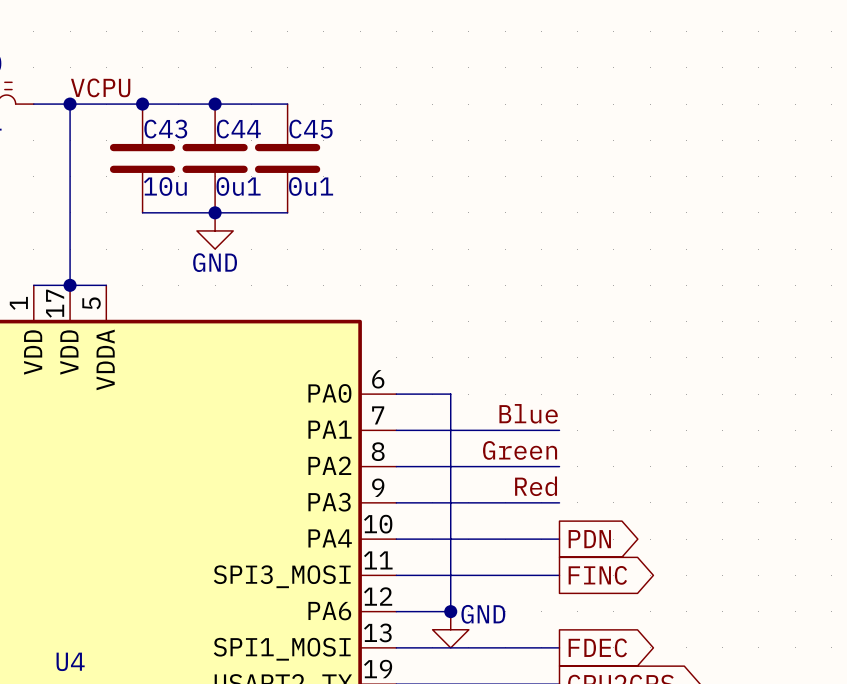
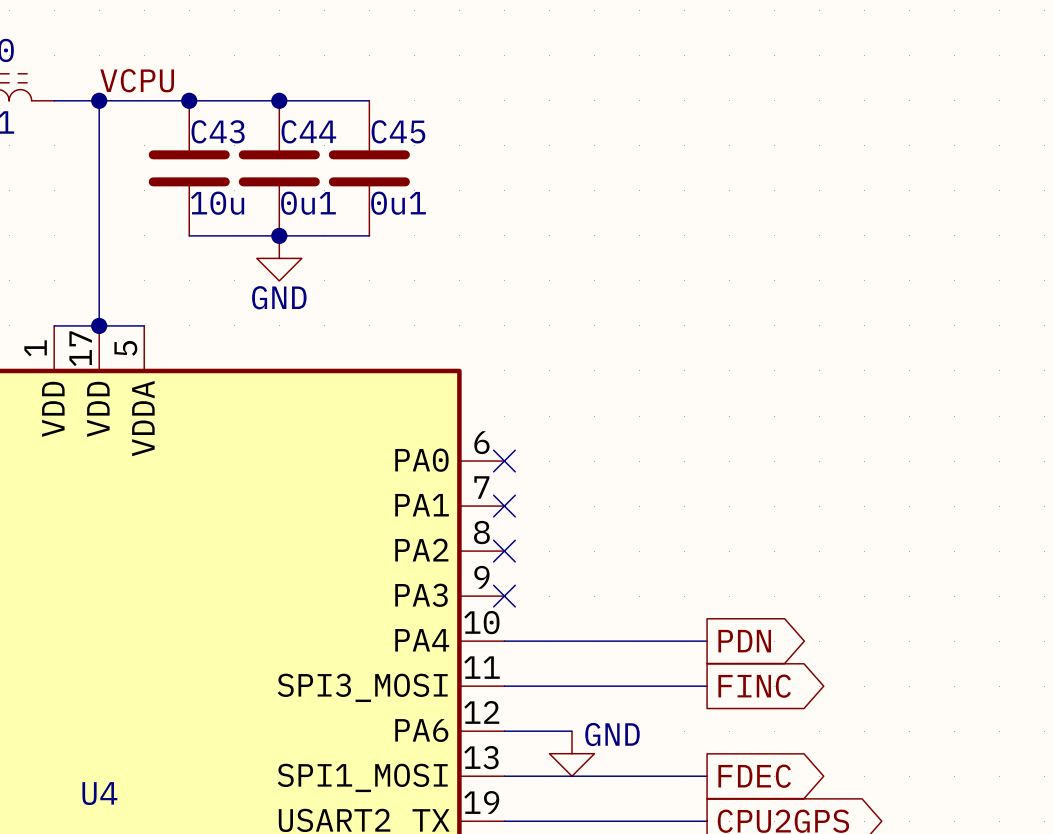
wire: (396, 394) (450, 394) (450, 611) -> none
no-connect mark: none -> (504, 461)
label: Blue (528, 413) -> none
wire: (396, 430) (559, 430) -> none
no-connect mark: none -> (504, 506)
label: Green (520, 450) -> none
wire: (396, 466) (559, 466) -> none
no-connect mark: none -> (504, 551)
label: Red (536, 486) -> none
wire: (396, 502) (559, 502) -> none
no-connect mark: none -> (504, 596)
junction: (450, 611) -> none

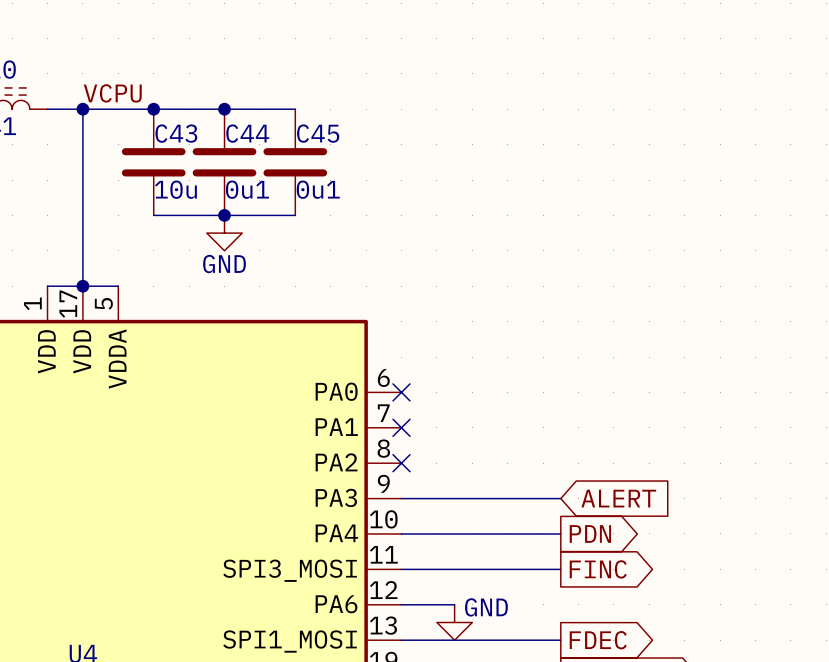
wire: none -> (401, 498) (560, 498)
no-connect mark: (504, 596) -> none
global label: none -> ALERT (618, 498)

